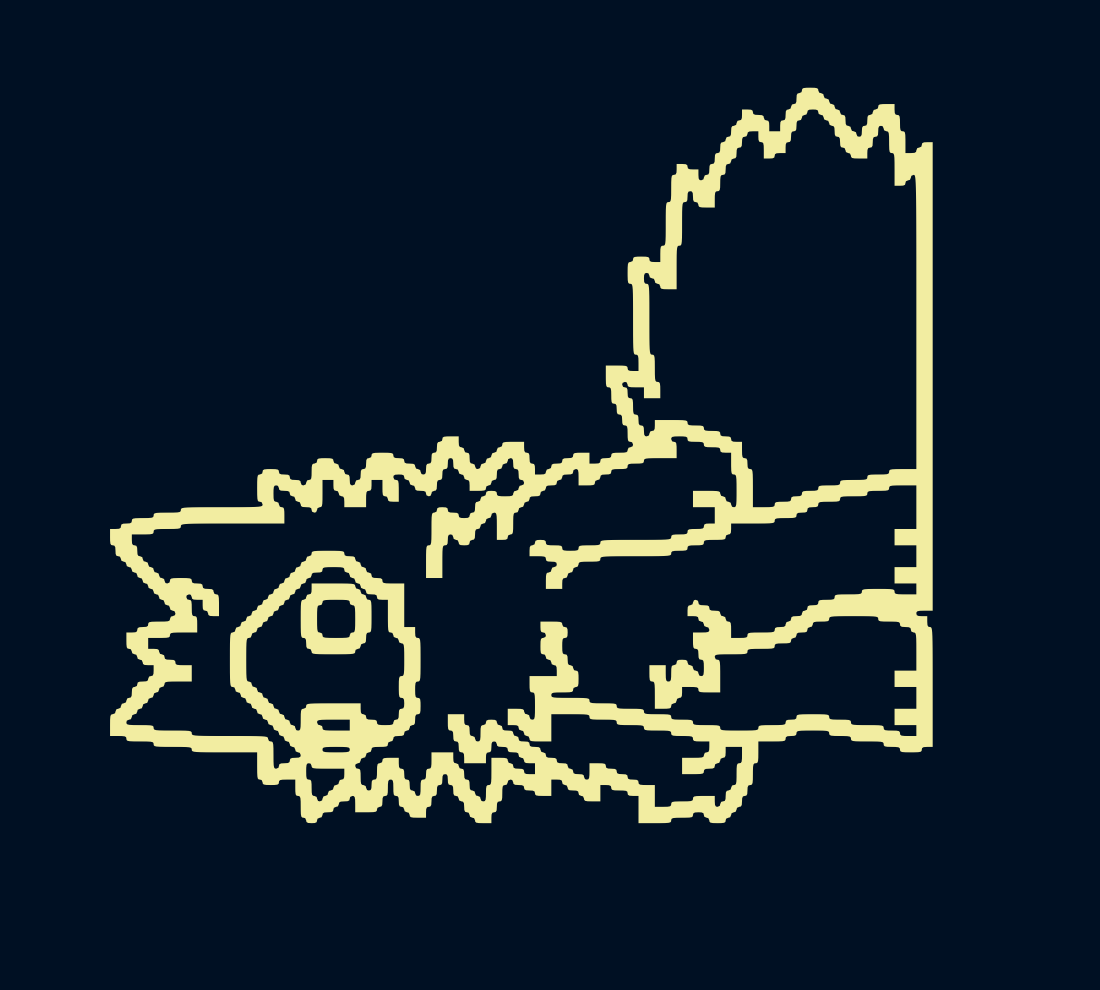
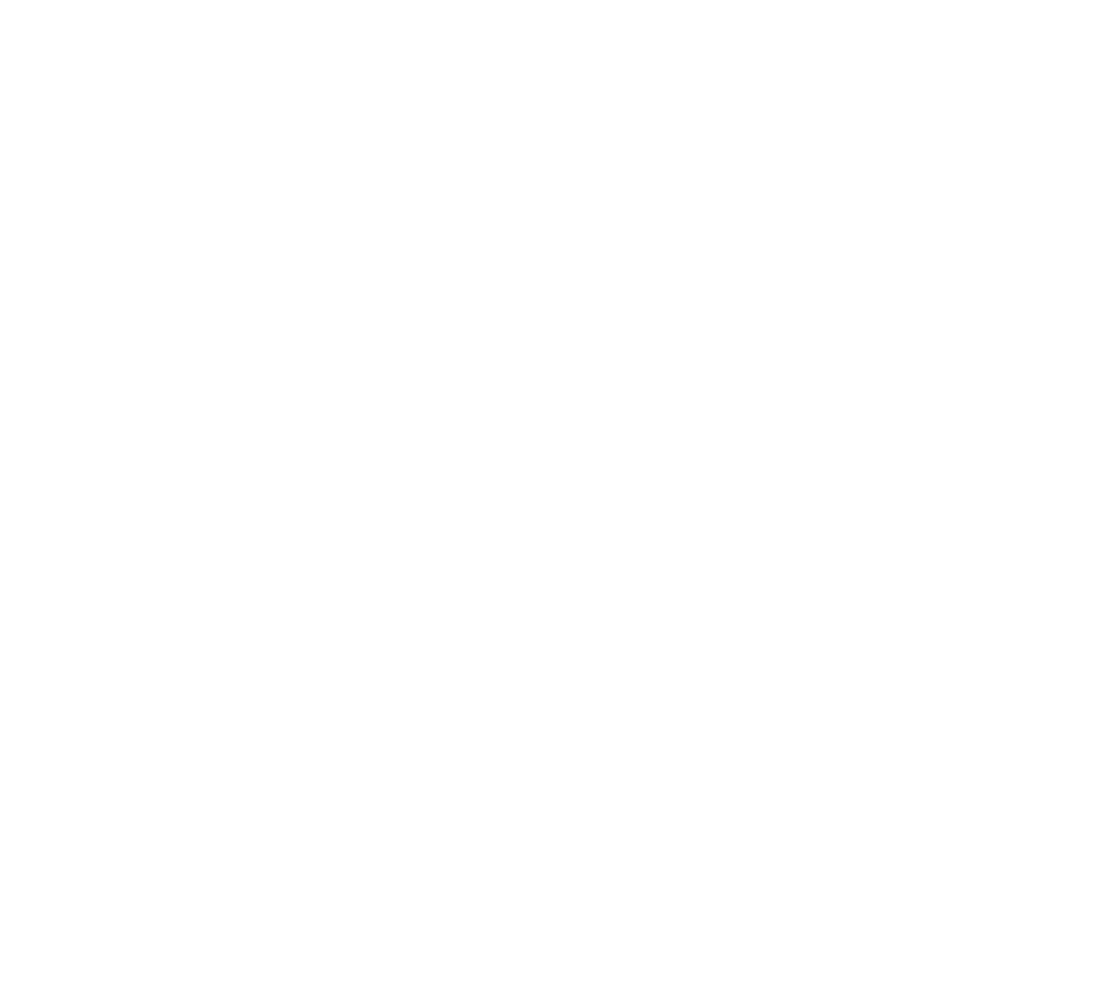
drawing: [110, 87, 933, 824] -> none

